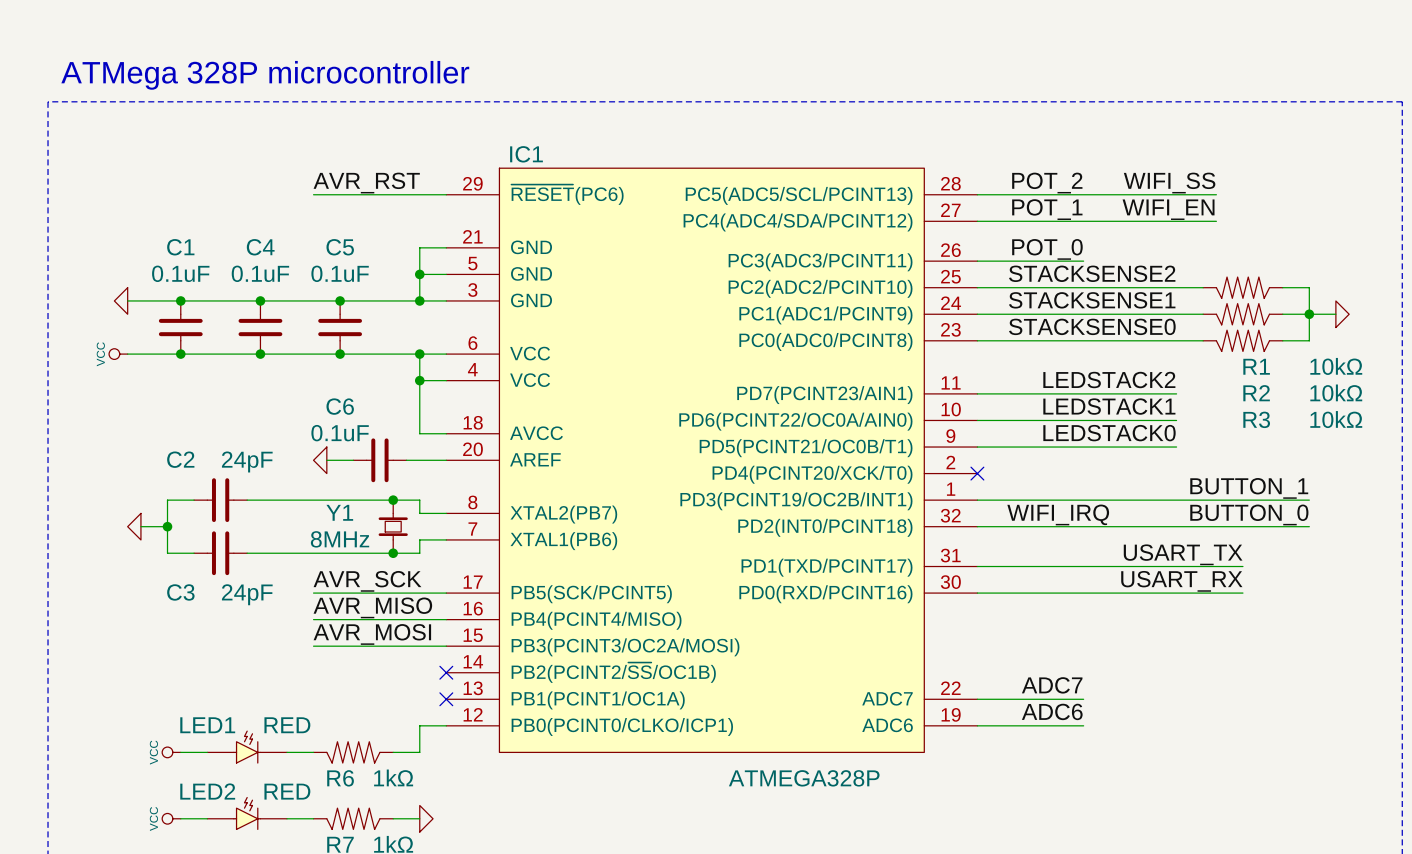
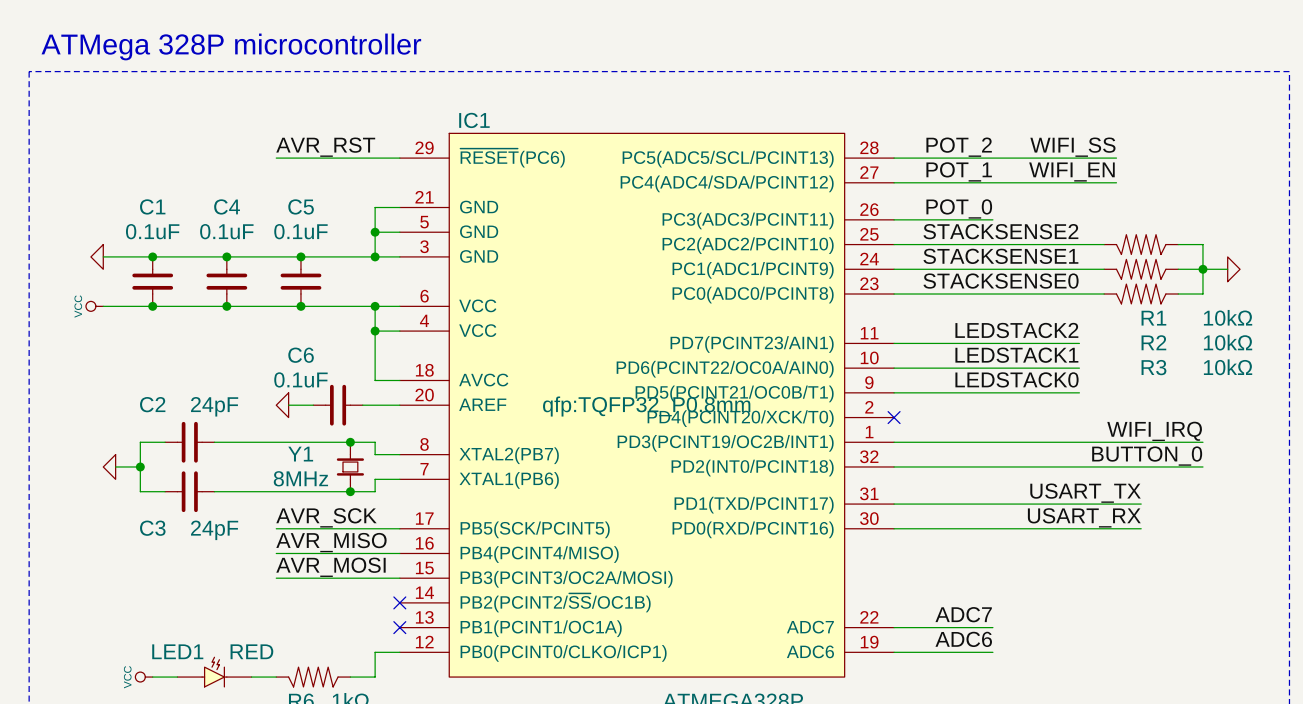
IC1 text: none -> qfp:TQFP32_P0.8mm (646, 406)
label: BUTTON_1 (1249, 488) -> WIFI_IRQ (1154, 431)
label: WIFI_IRQ (1058, 514) -> none

